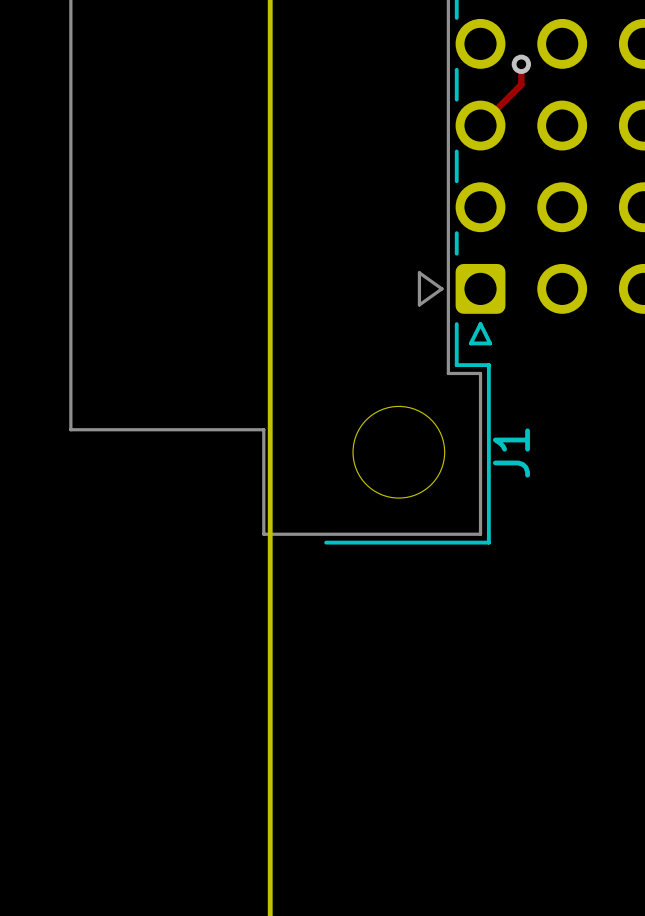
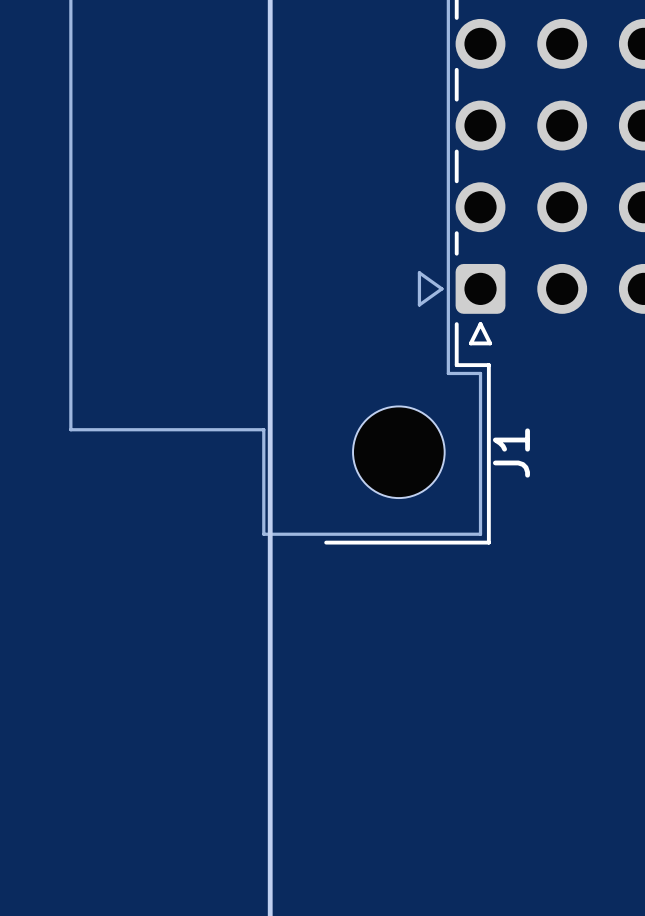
track: (521, 64) (521, 84) (480, 125) -> none
via: (521, 64) -> none

